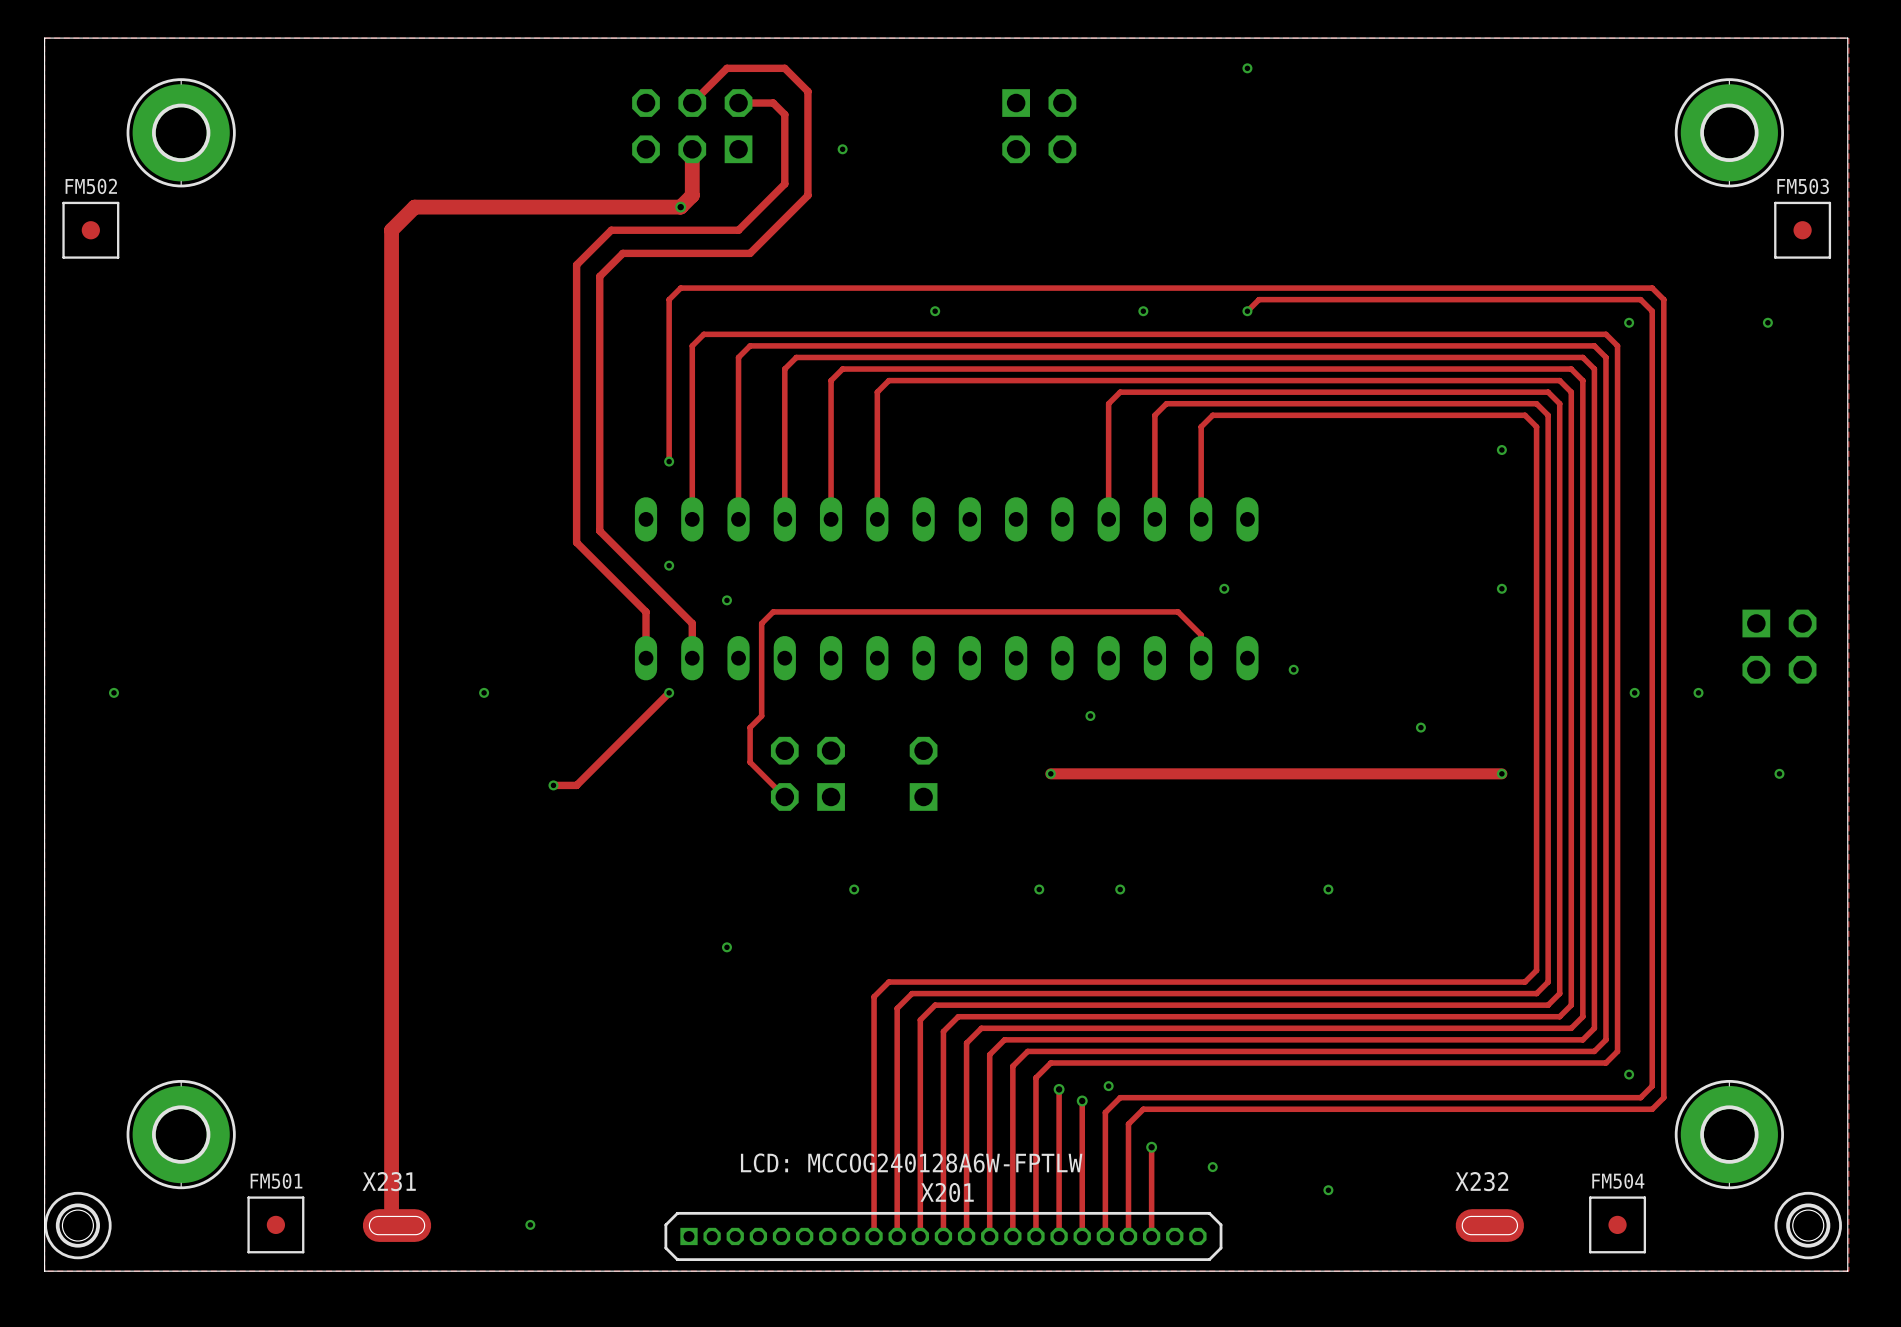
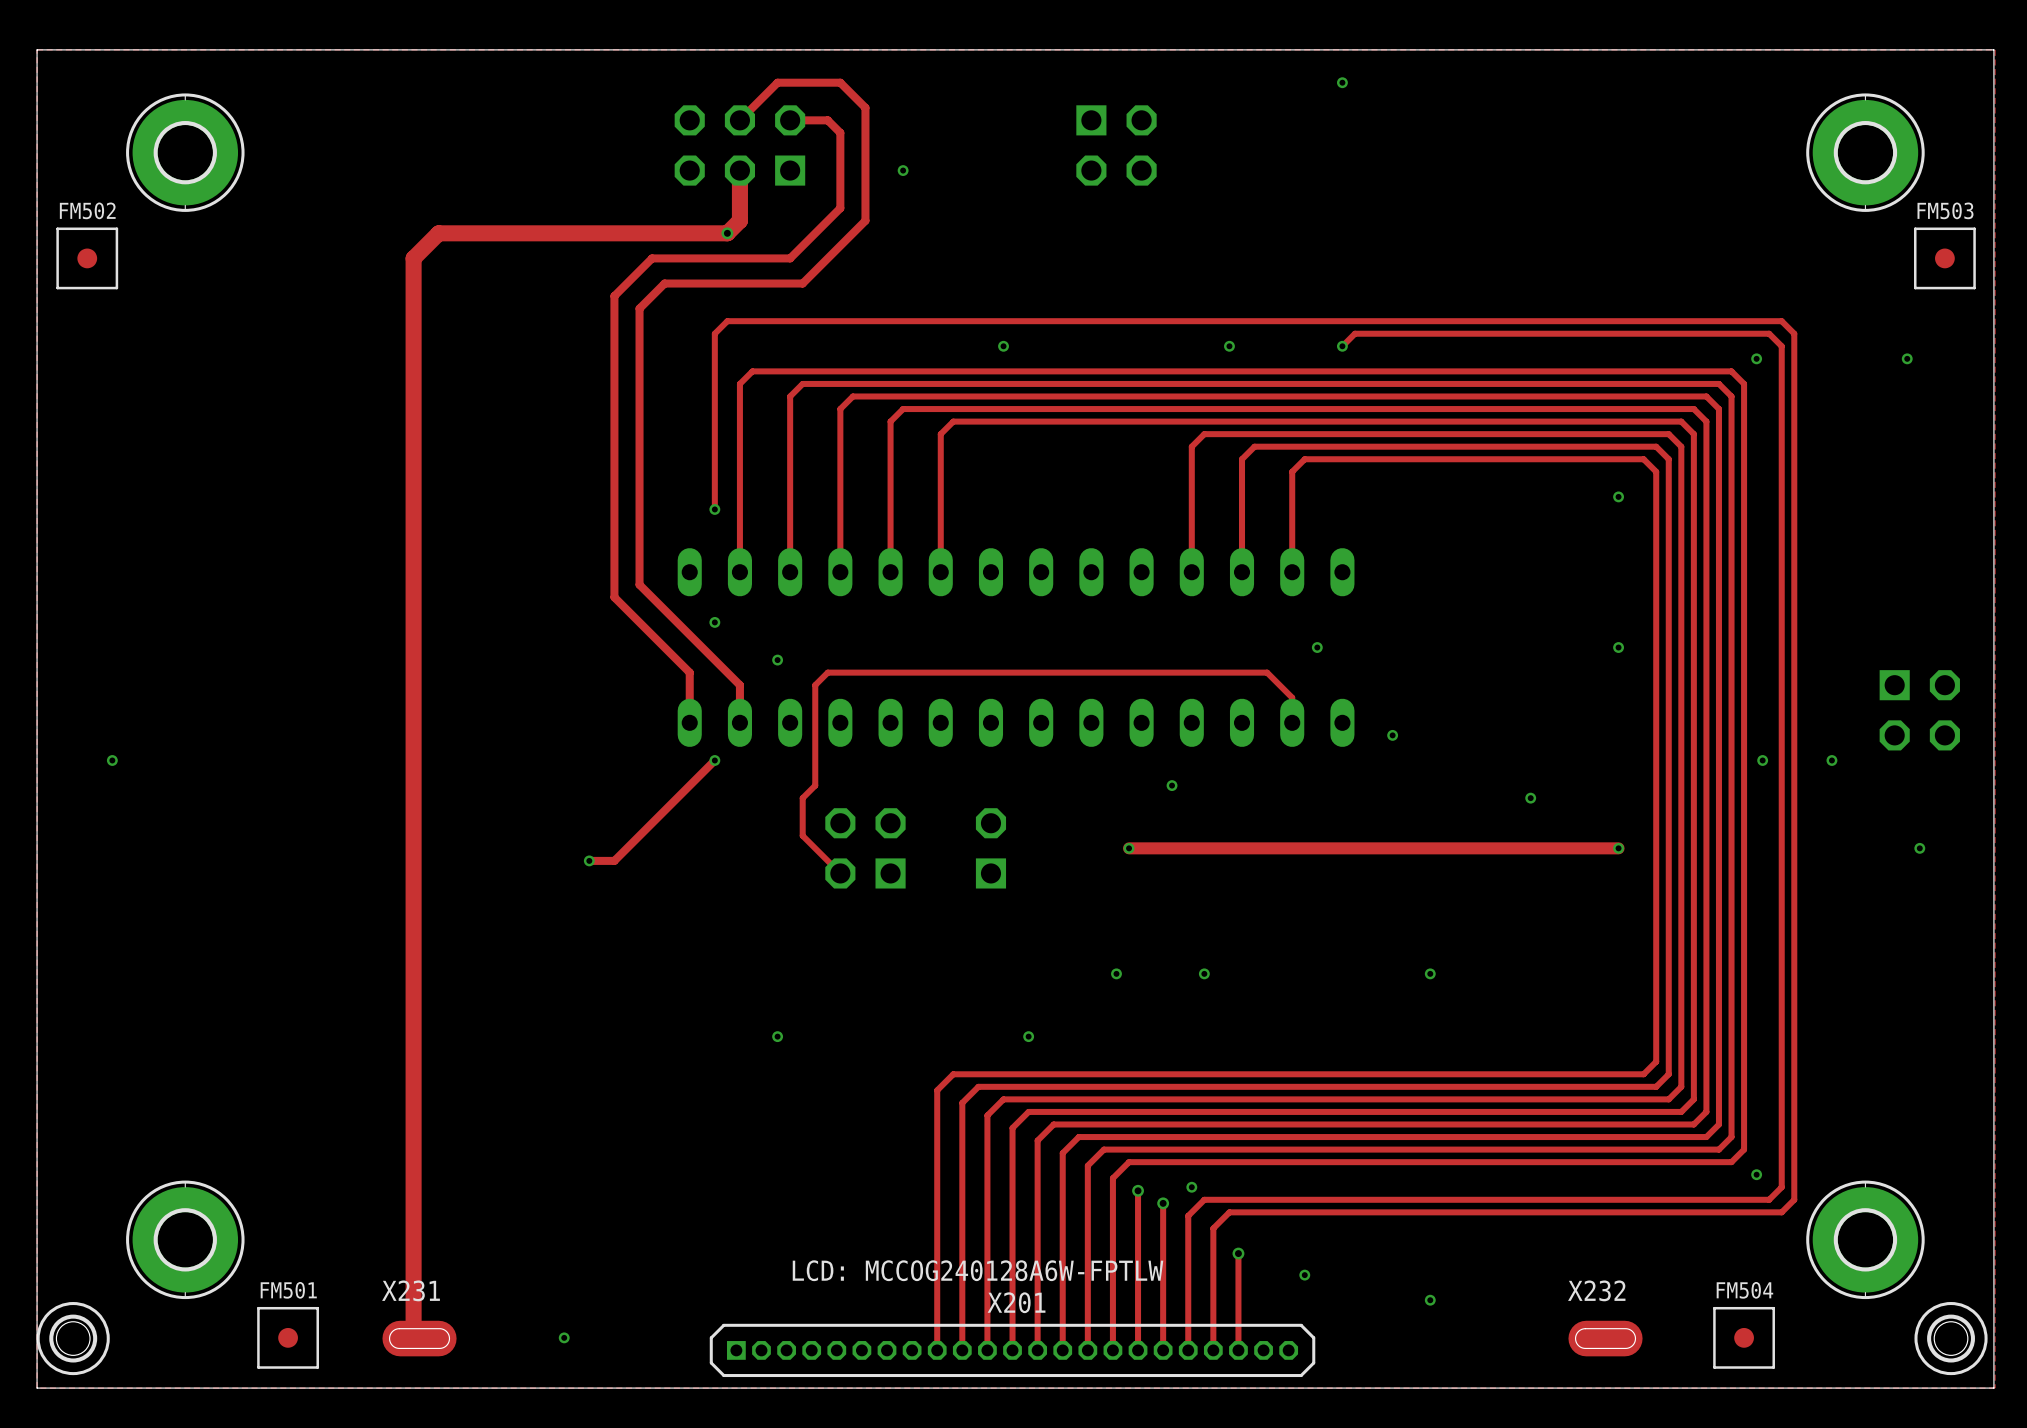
via: (484, 692) -> none
via: (854, 889) -> none
via: none -> (1028, 1036)

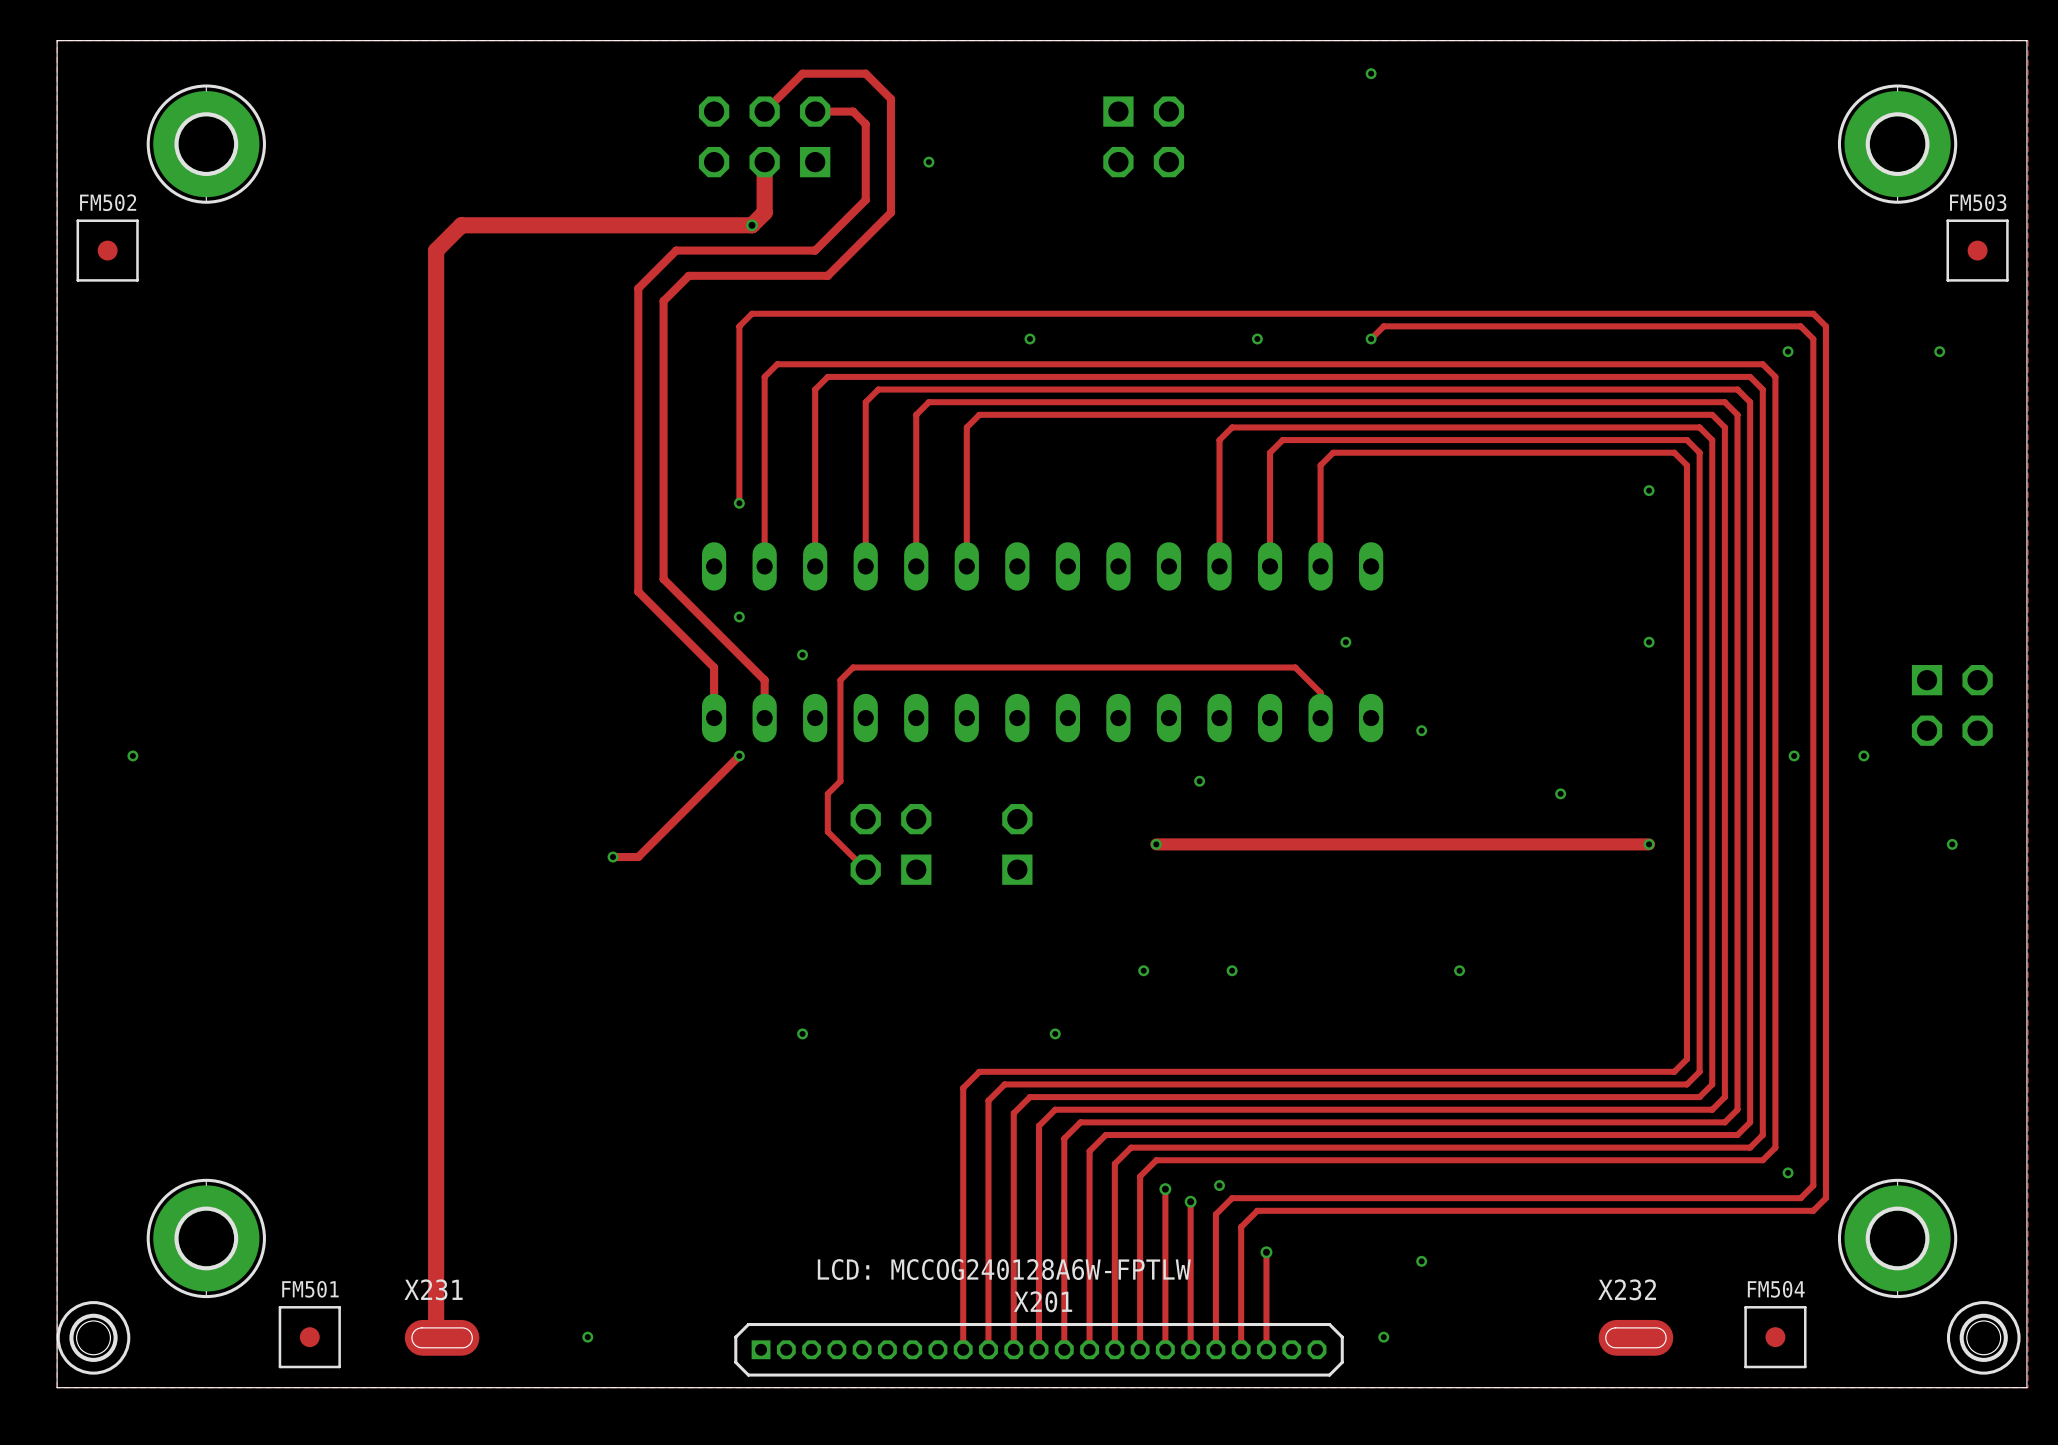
via: none -> (1421, 1261)
via: (1304, 1275) -> none
via: (1430, 1300) -> none
via: none -> (1383, 1337)

